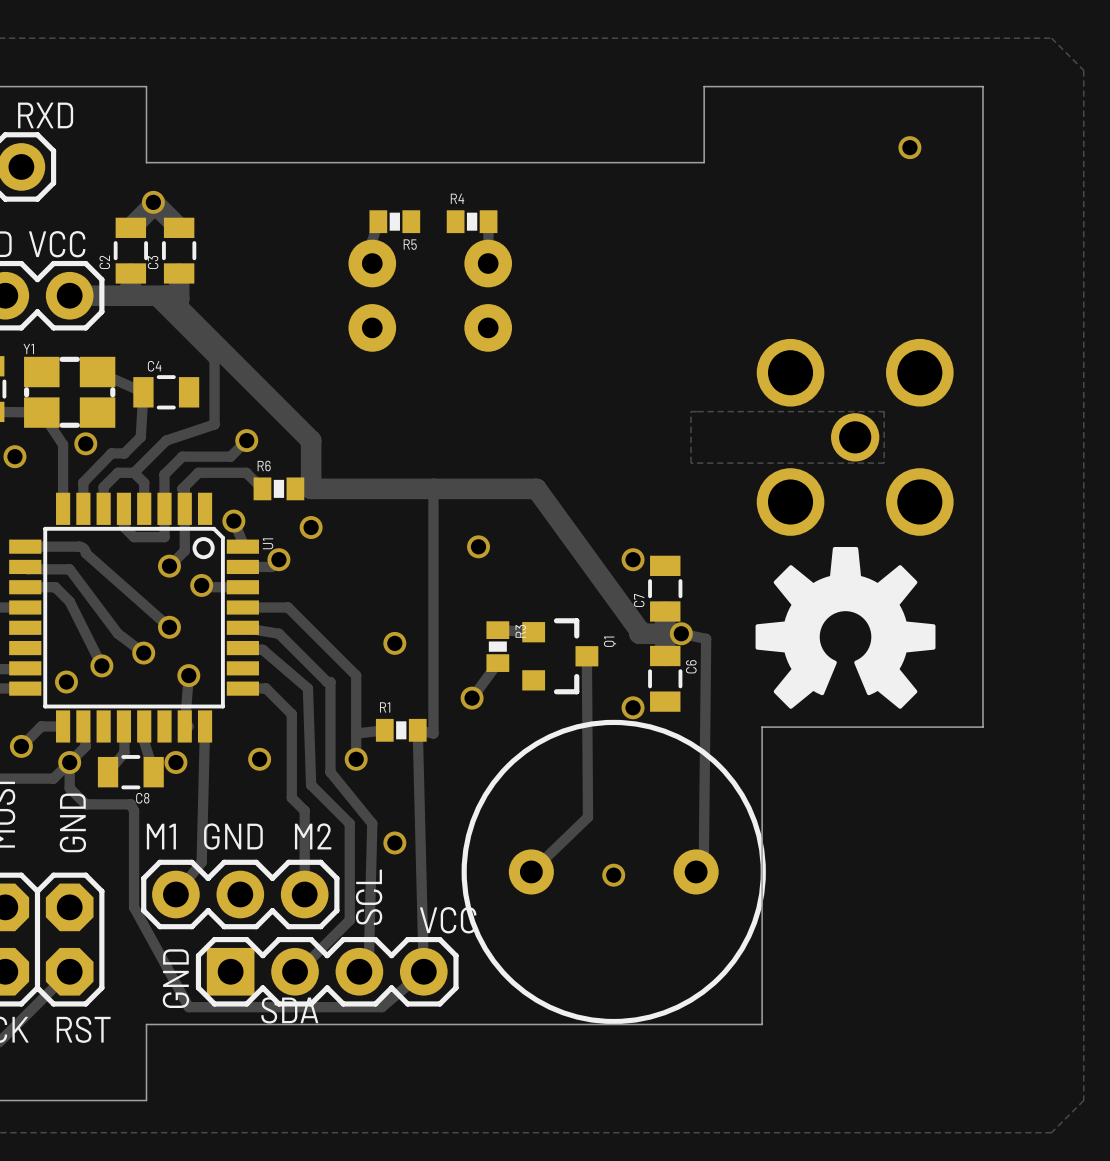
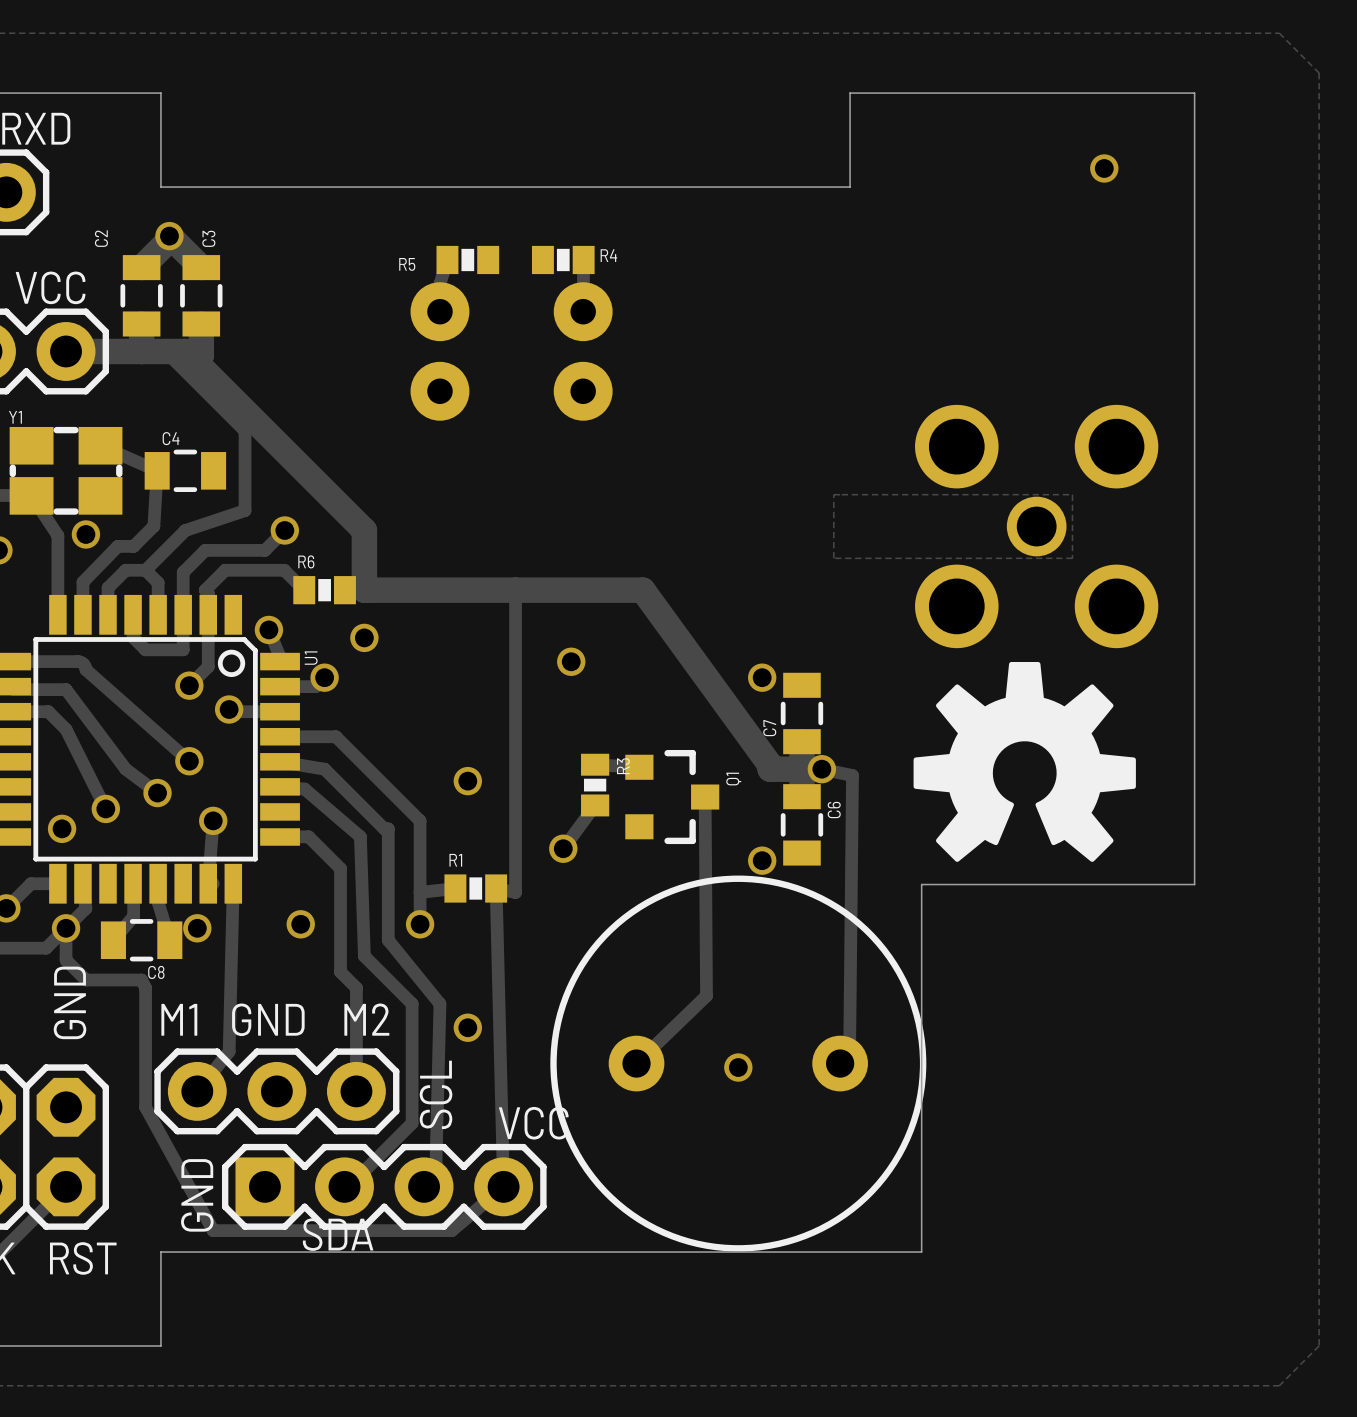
R4 name position: R4 (457, 198) -> R4 (608, 255)
R5 name position: R5 (410, 244) -> R5 (407, 264)
C2 name position: C2 (104, 262) -> C2 (101, 238)
C3 name position: C3 (153, 262) -> C3 (208, 238)

